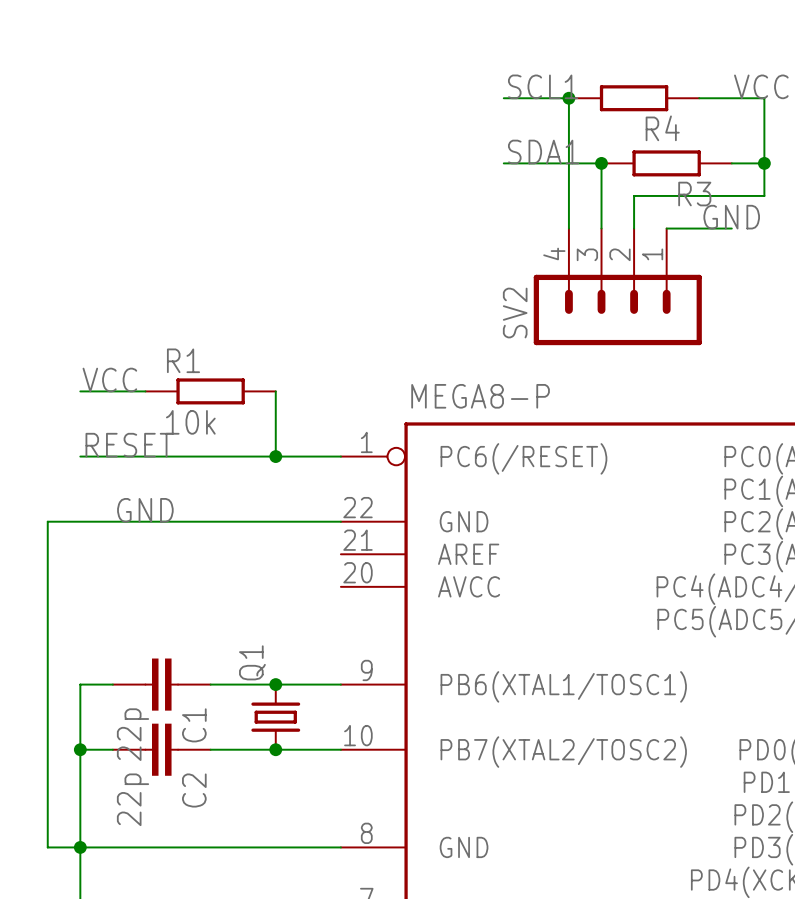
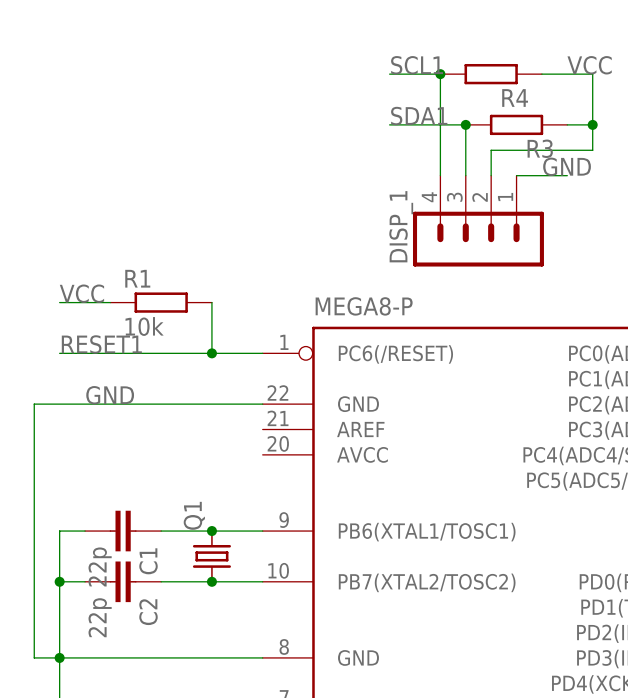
SV2 name: SV2 (515, 313) -> DISP_1 (401, 226)
label: RESET (129, 445) -> RESET1 (101, 344)

